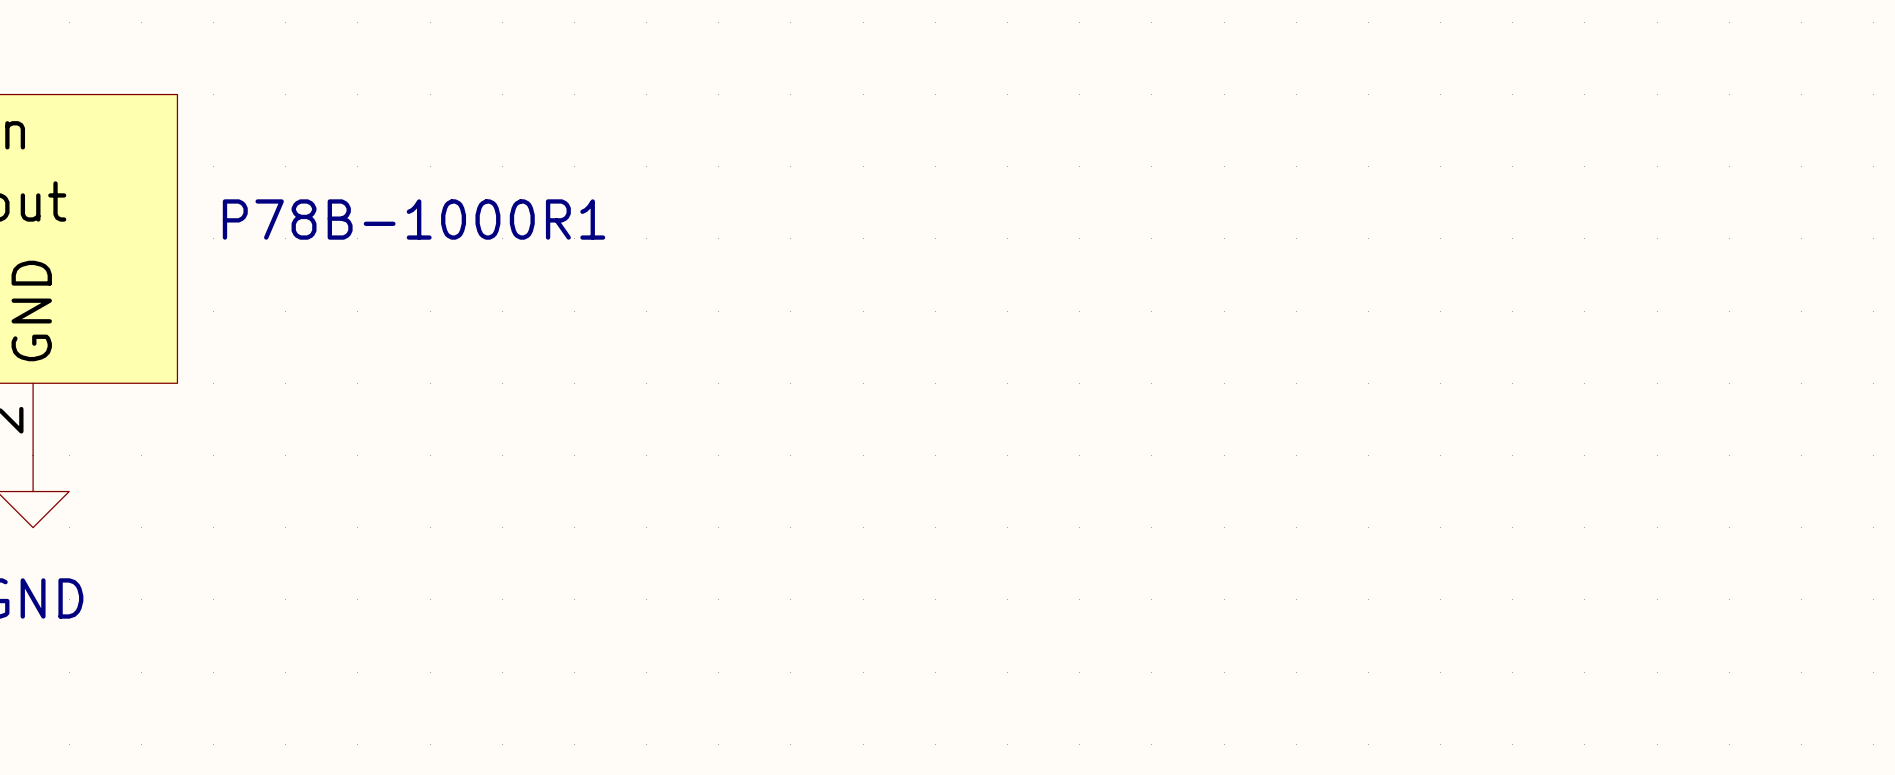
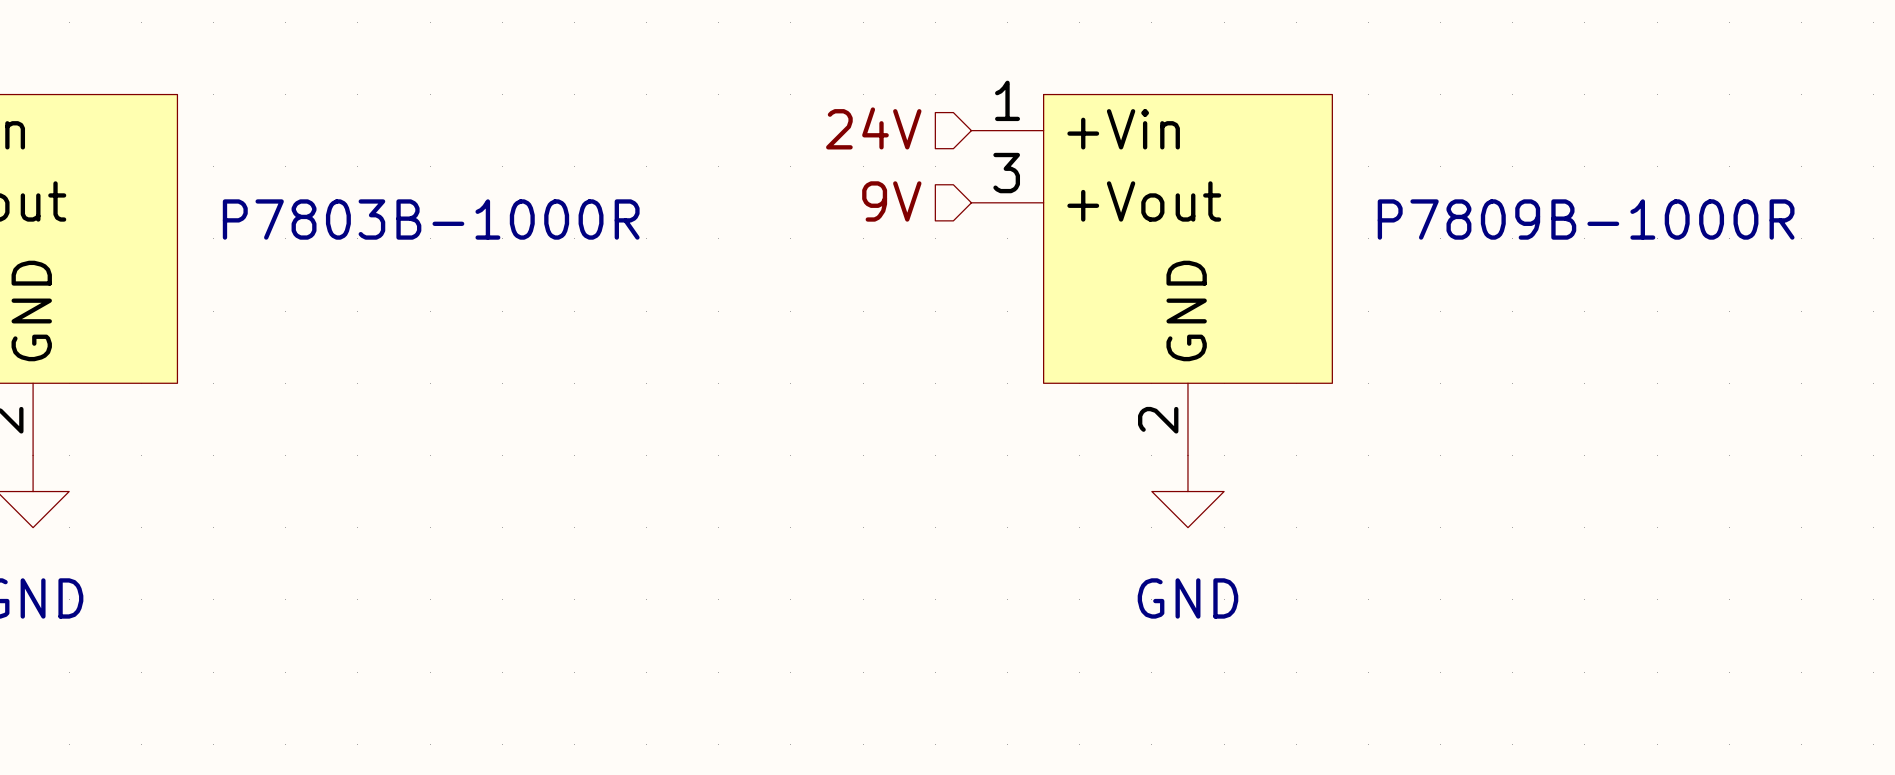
hierarchical label: none -> 24V (873, 128)
hierarchical label: none -> 9V (891, 201)
P78B-1000R1 name: P78B-1000R1 (414, 219) -> P7803B-1000R (431, 219)
P7809B-1000R: none -> (1151, 275)
power symbol: none -> GND (1187, 491)

